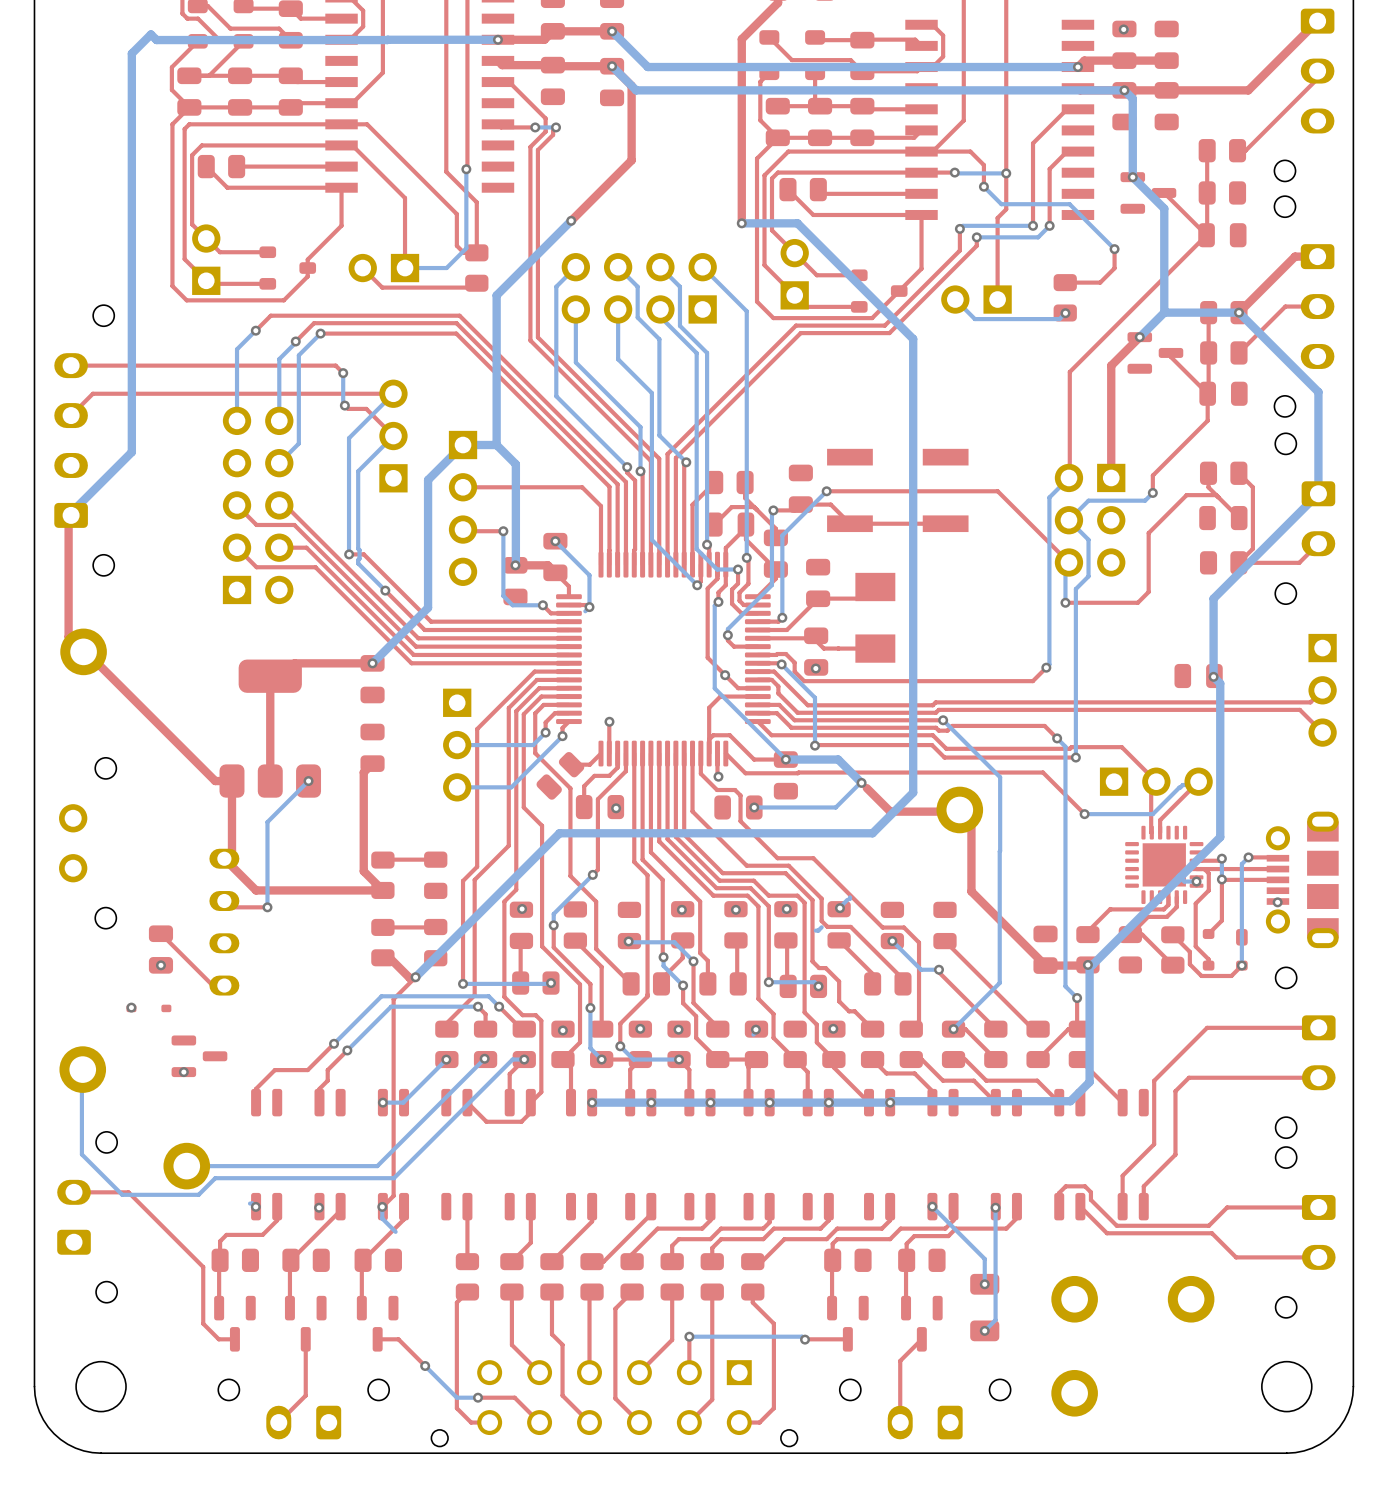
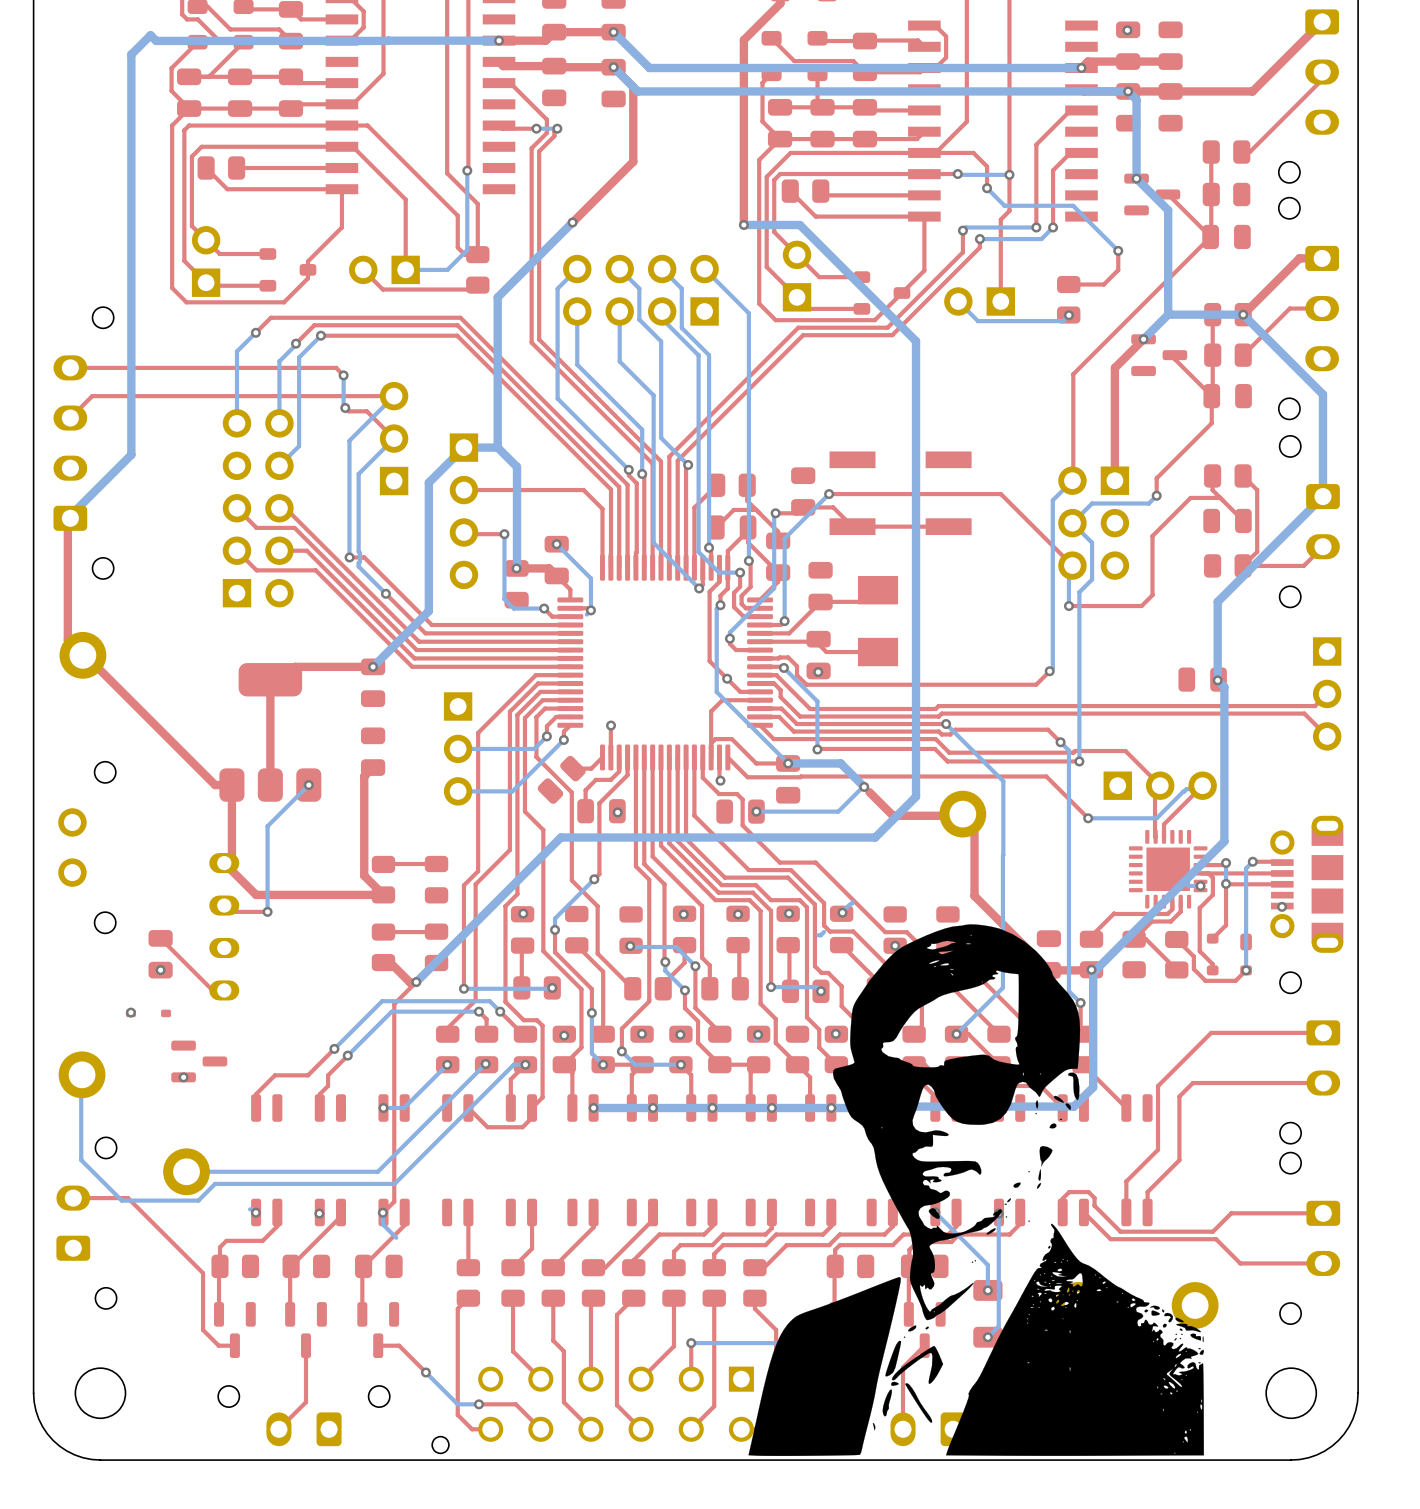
drawing: none -> [748, 924, 1204, 1456]

